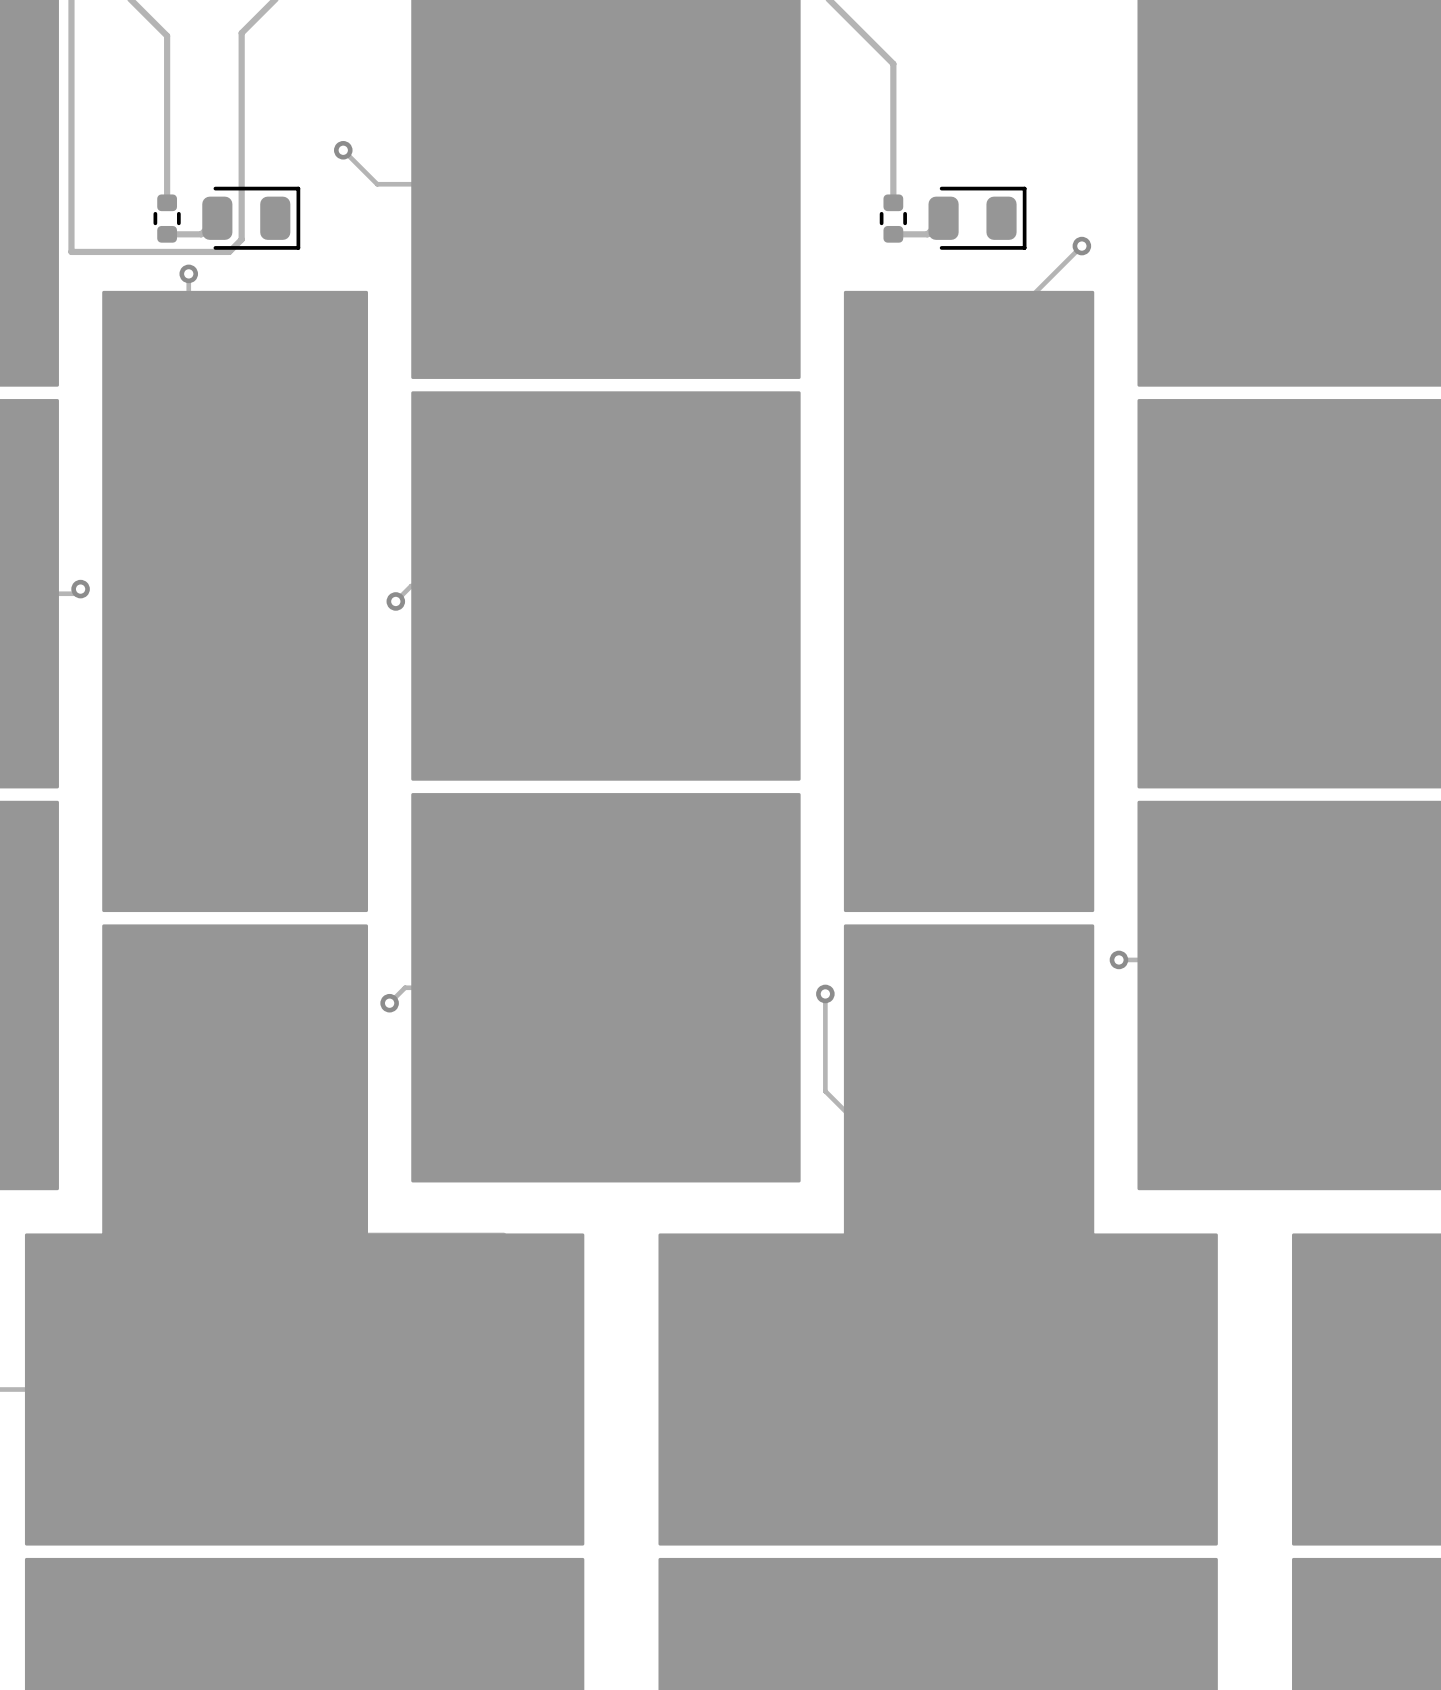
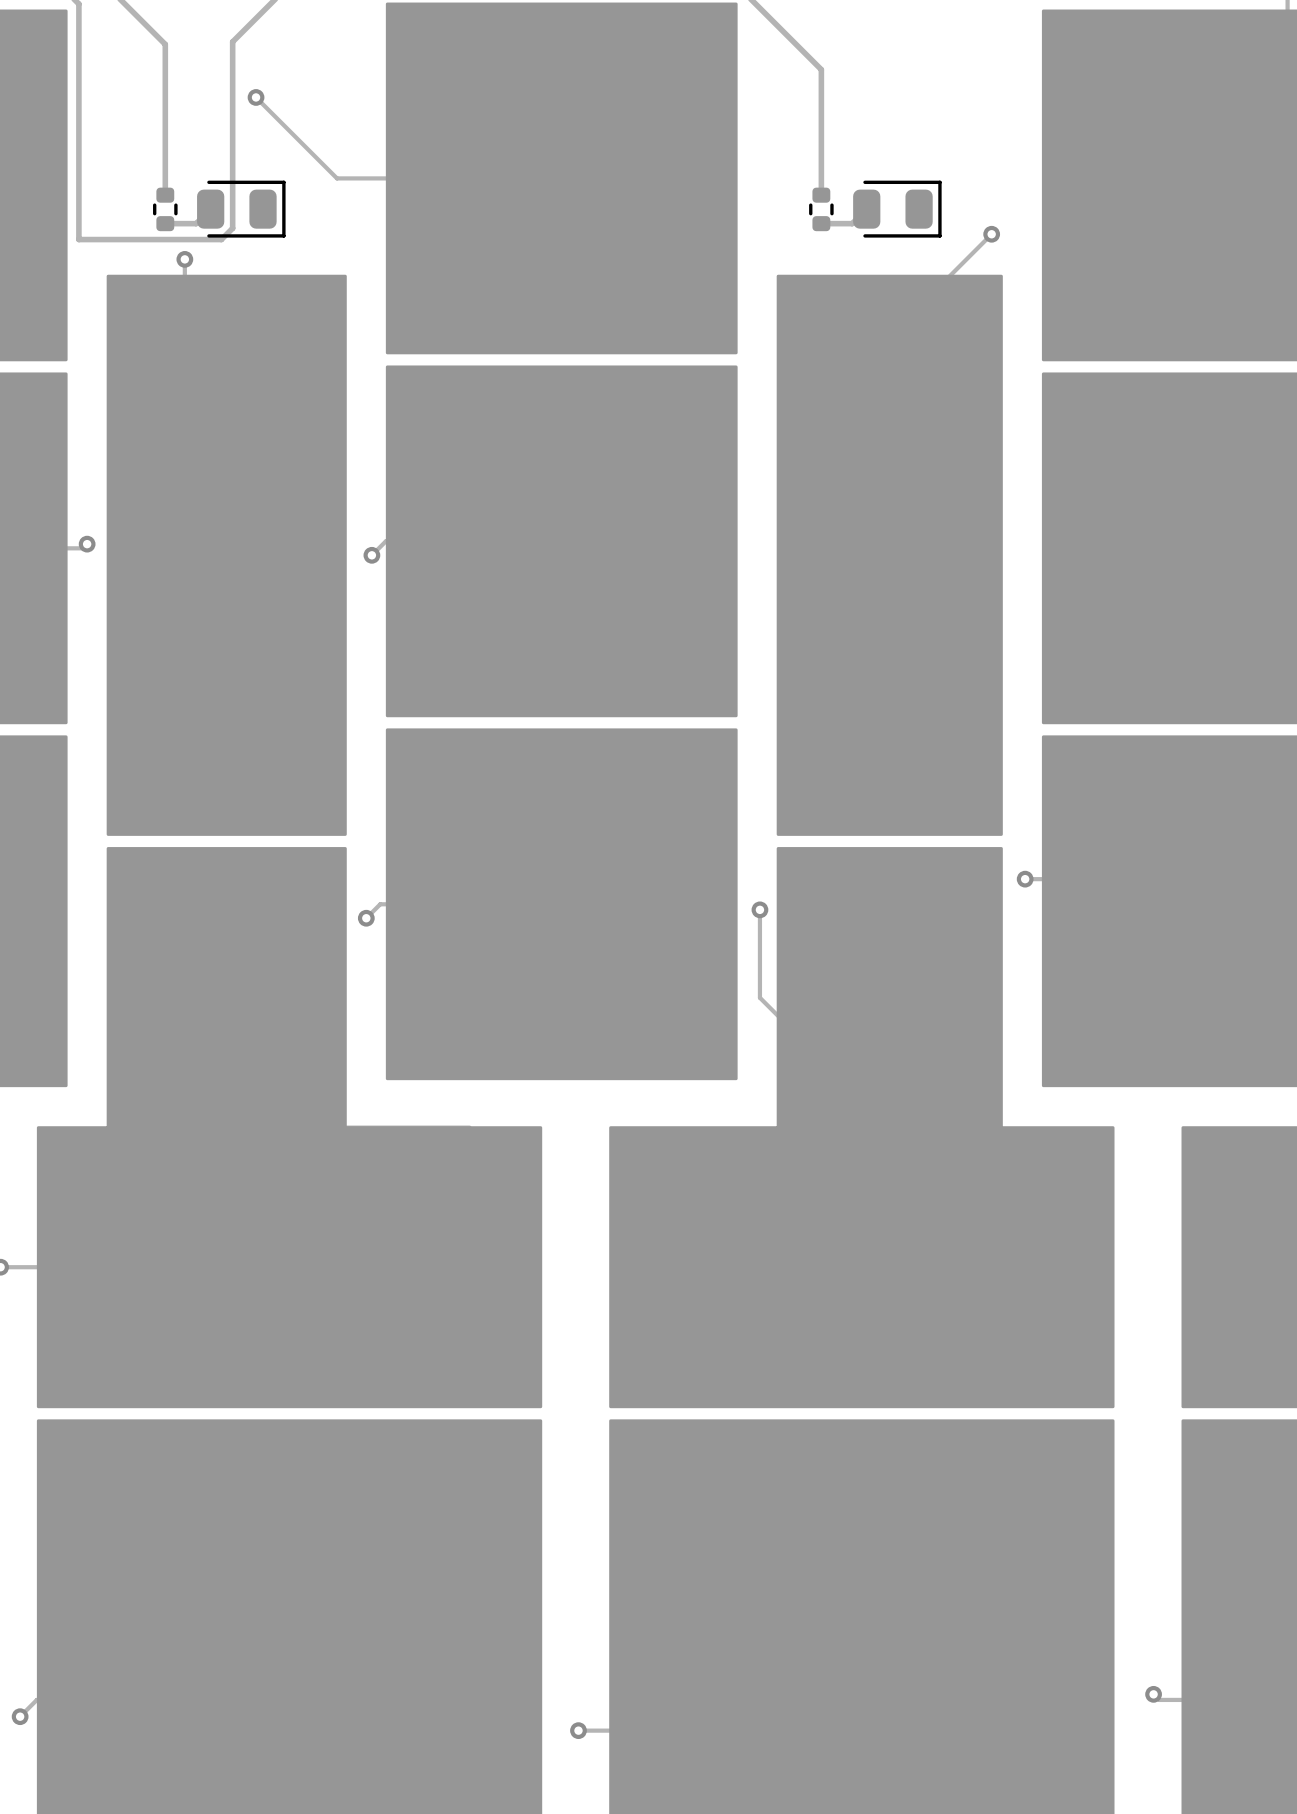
track: (343, 150) (377, 184) -> (256, 97) (337, 178) (355, 178)
via position: (343, 150) -> (256, 97)

